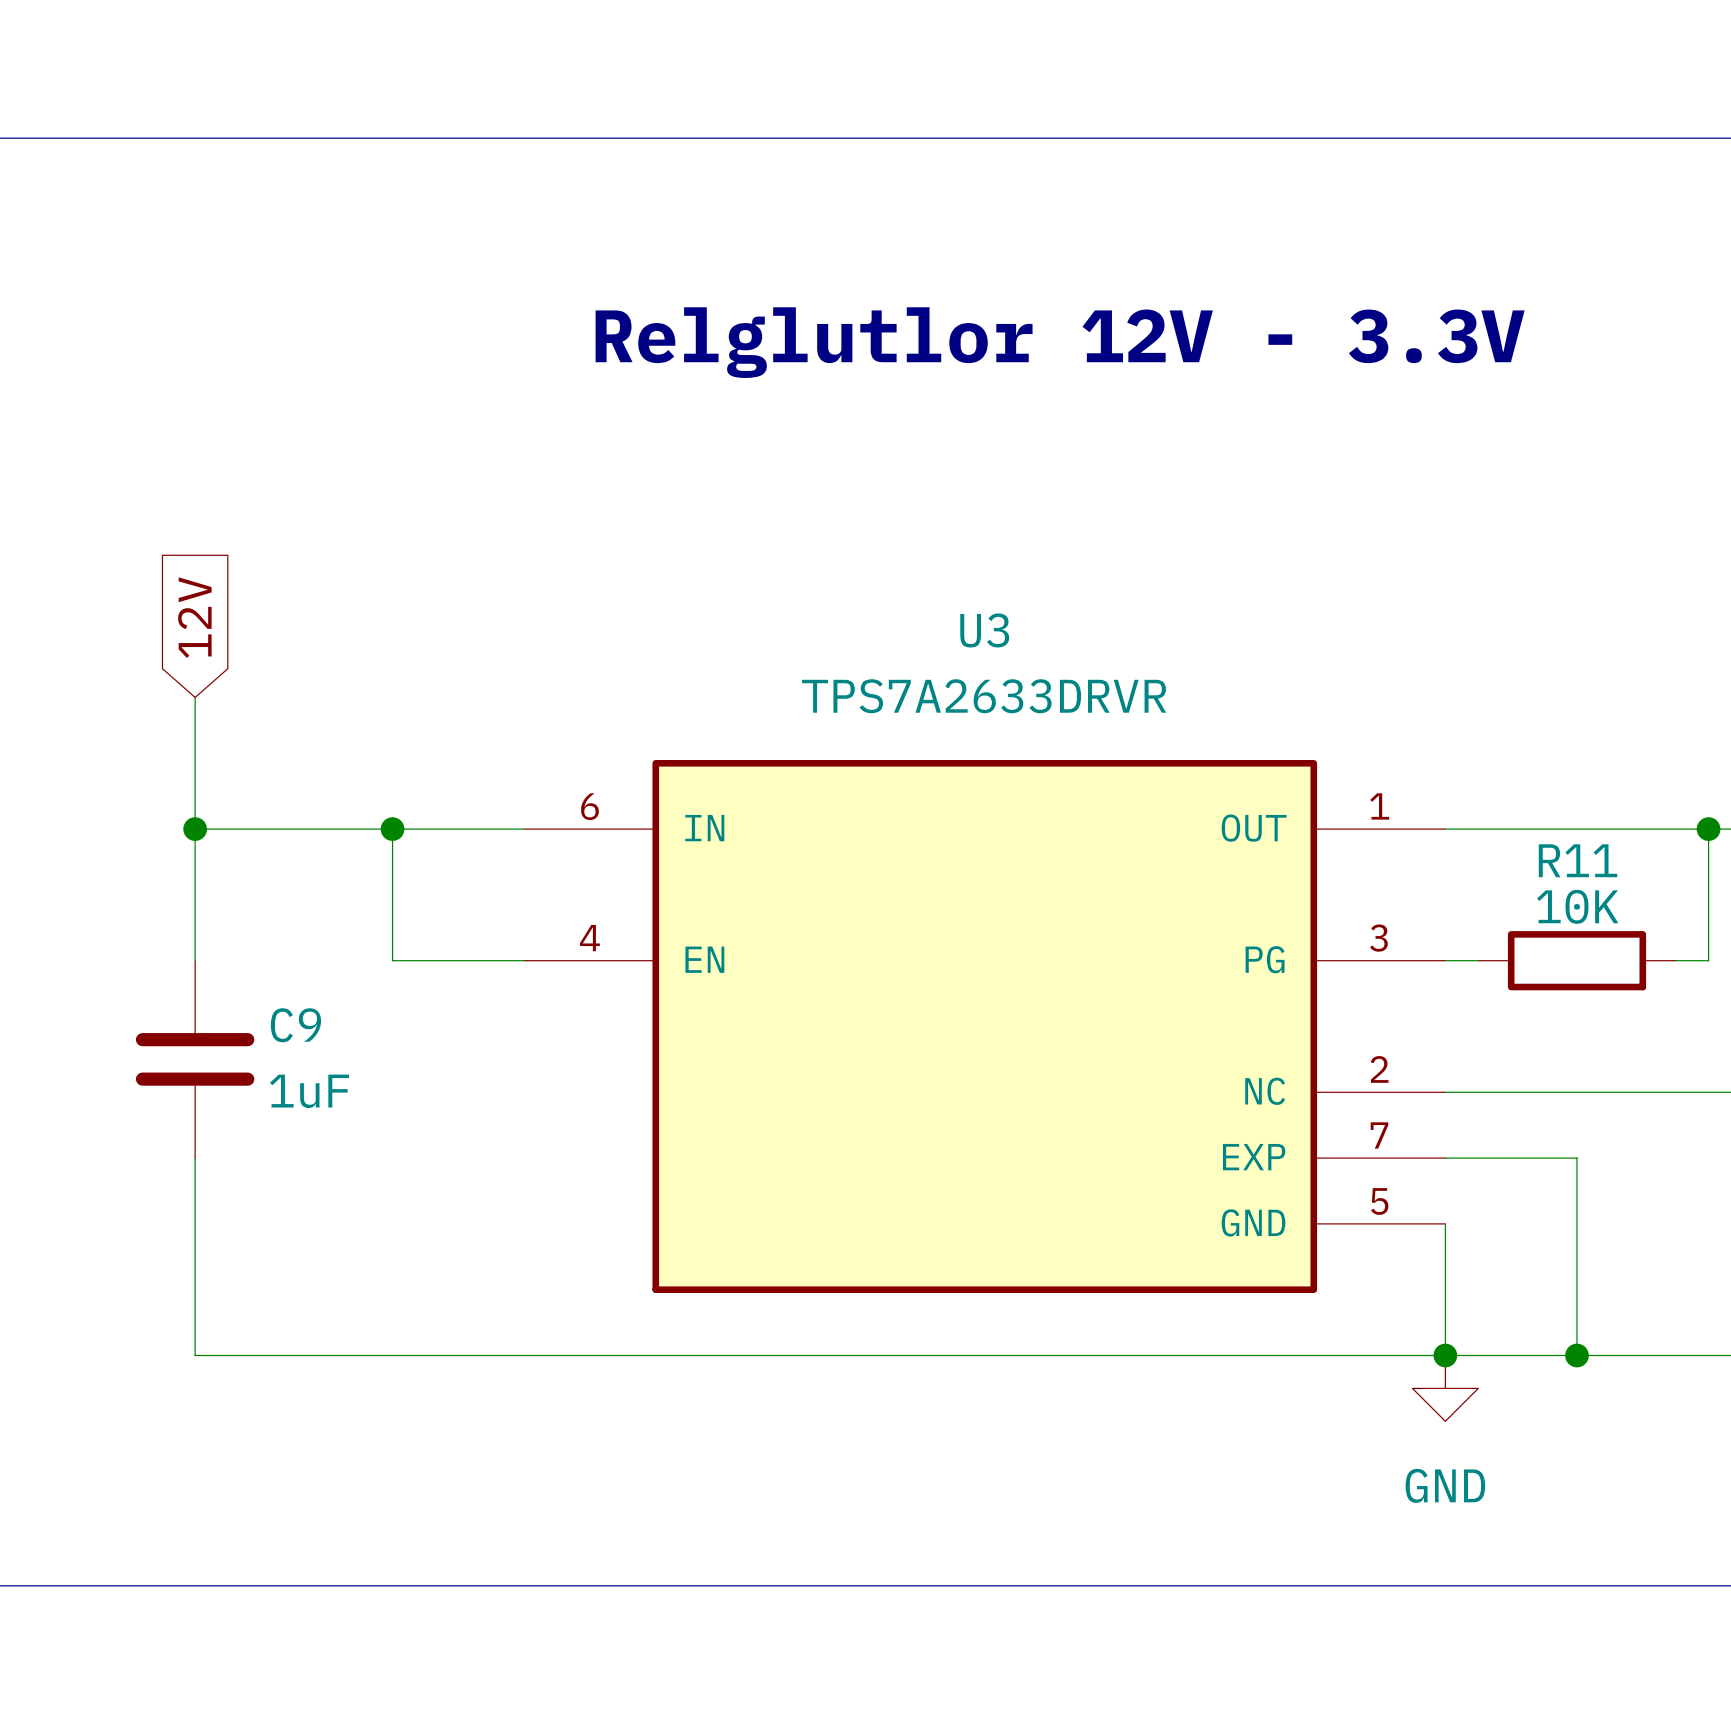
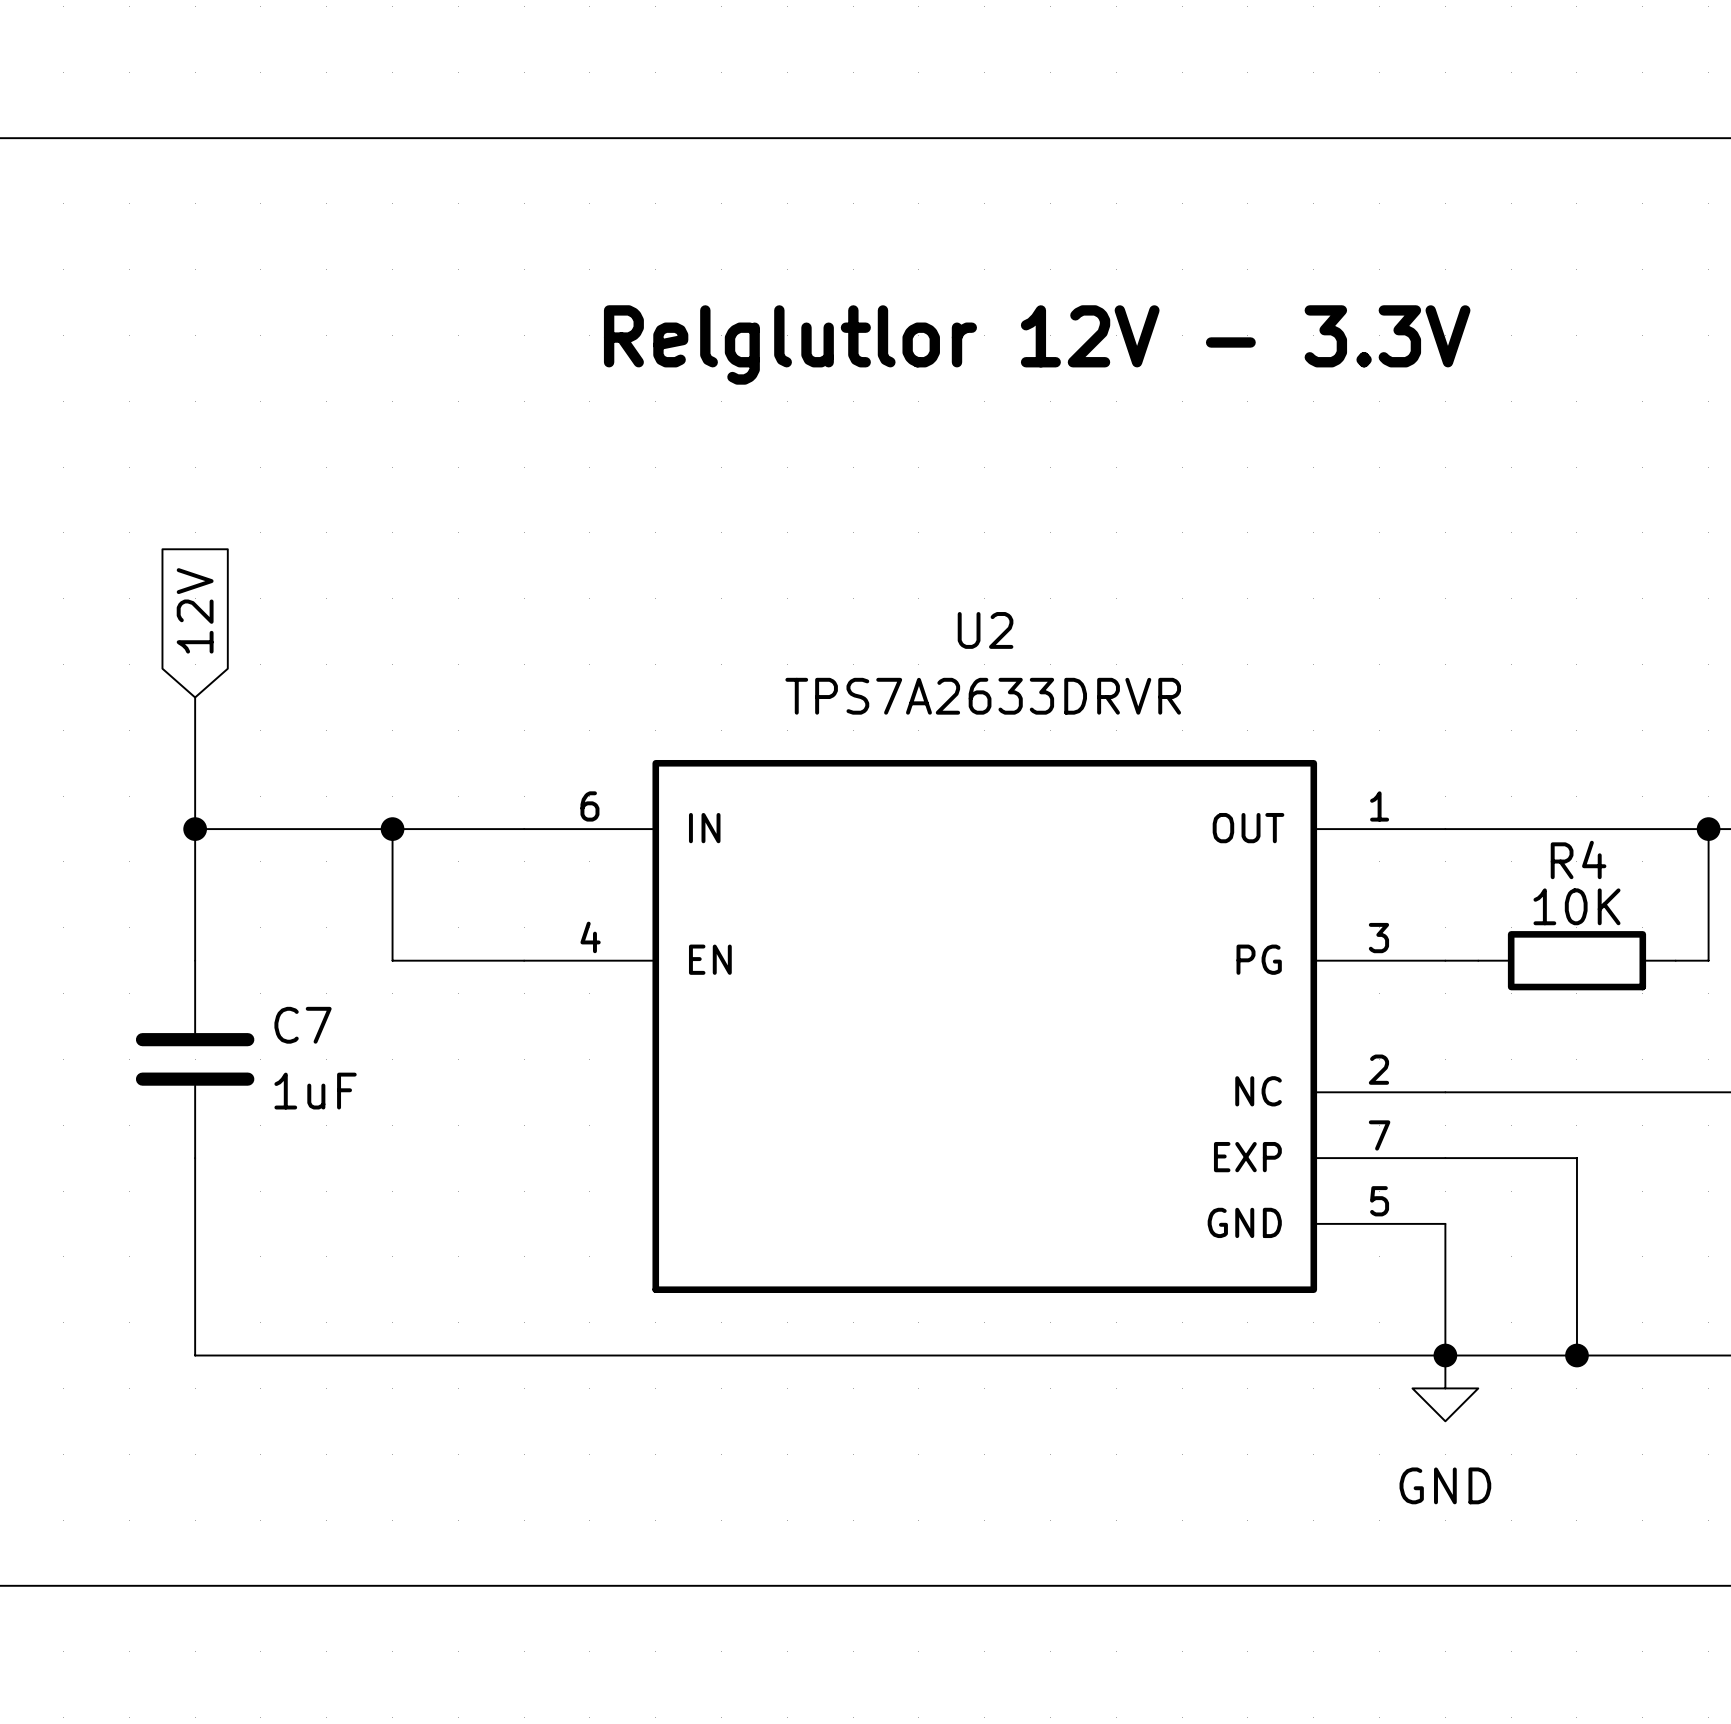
U3 name: U3 (984, 630) -> U2 (985, 630)
R11 name: R11 (1578, 860) -> R4 (1578, 859)
C9 name: C9 (295, 1025) -> C7 (303, 1025)

